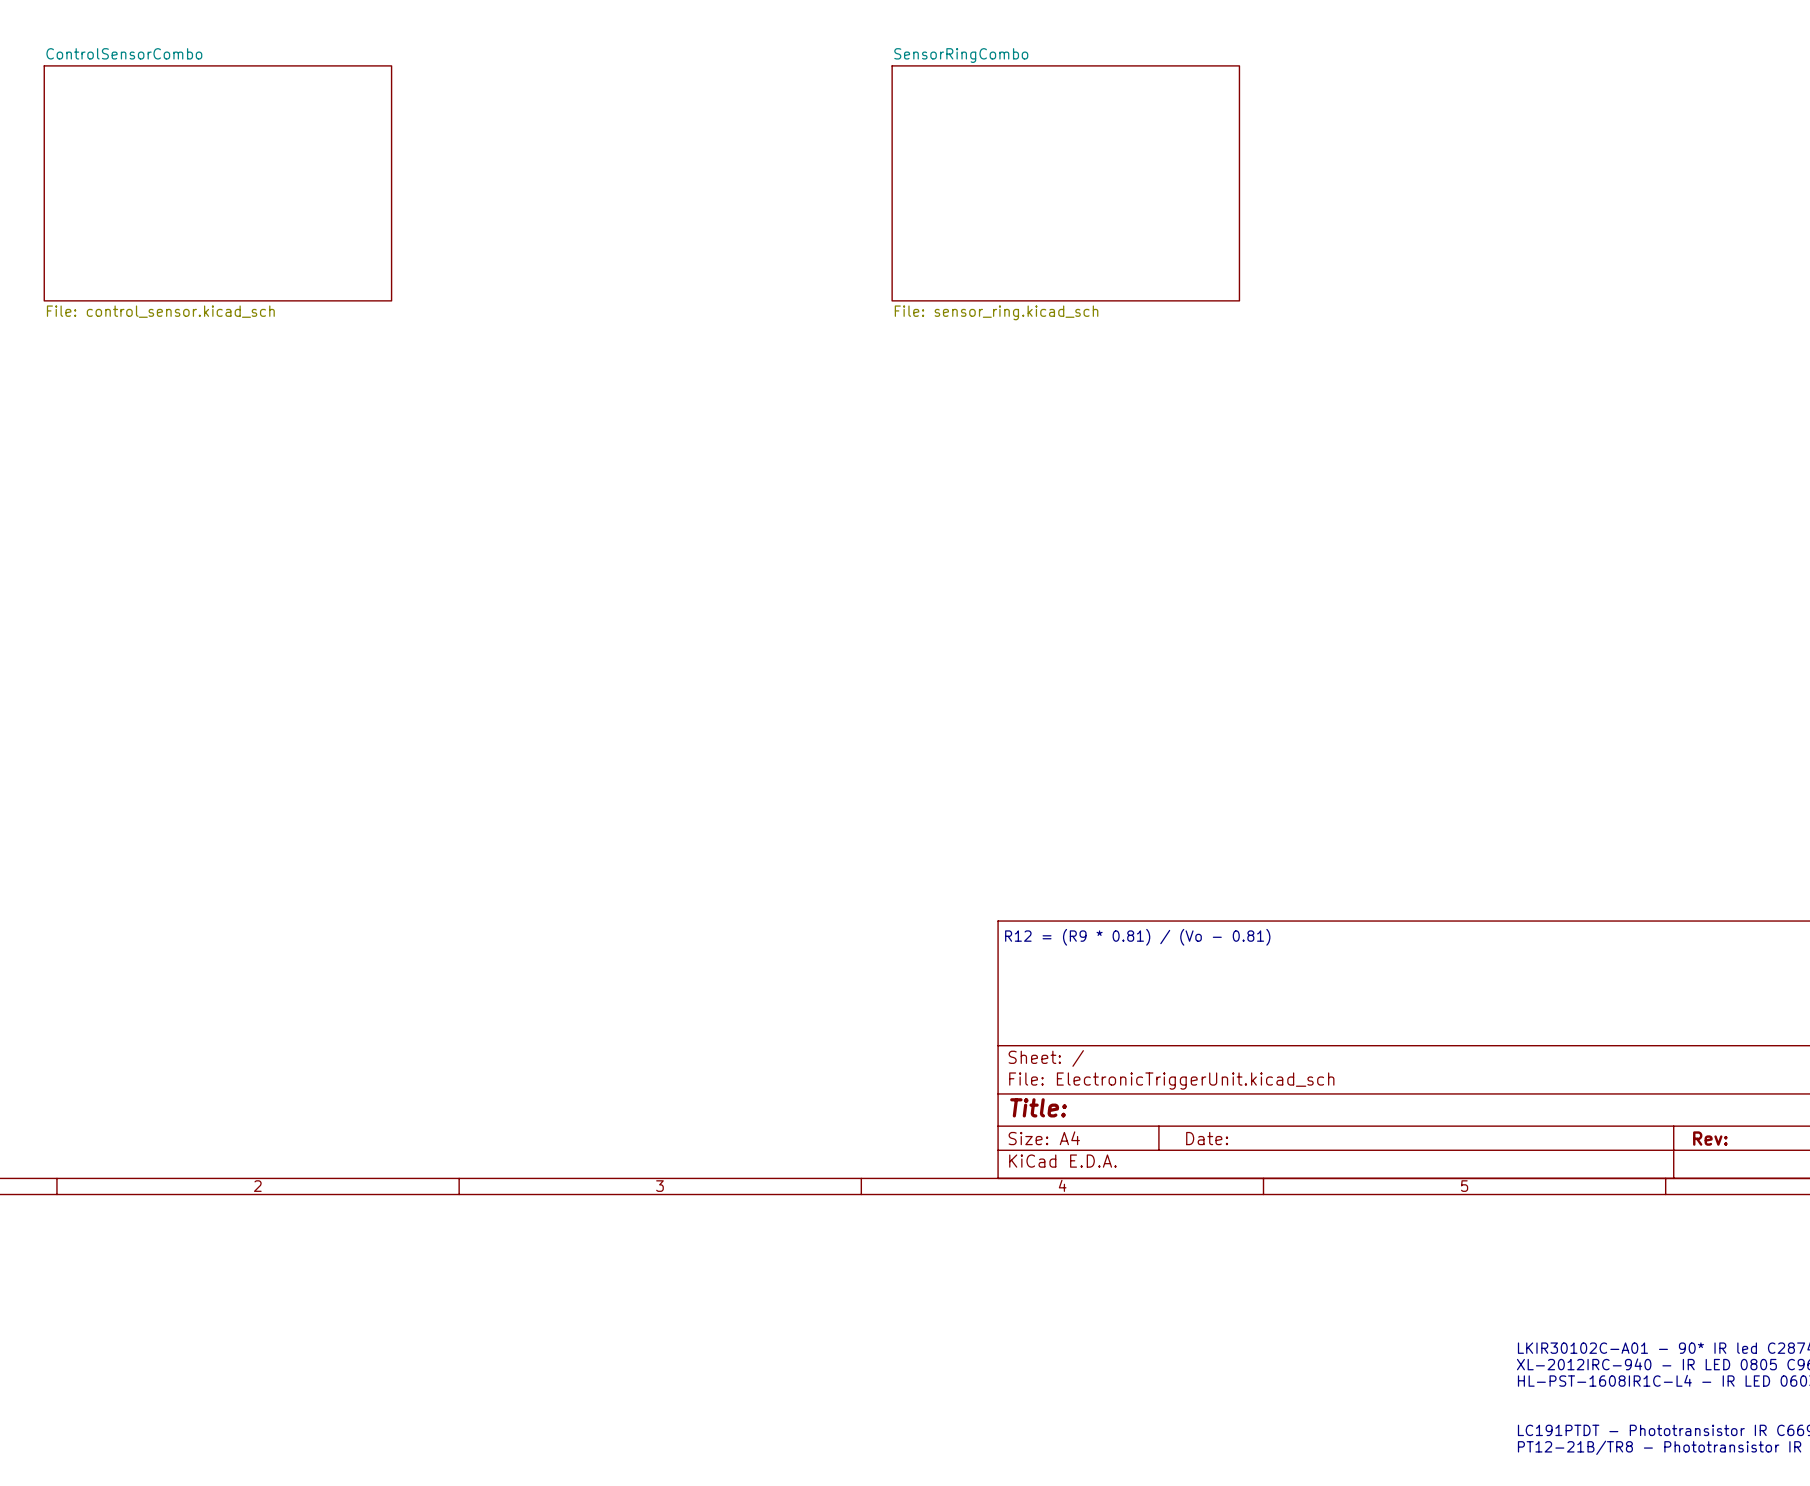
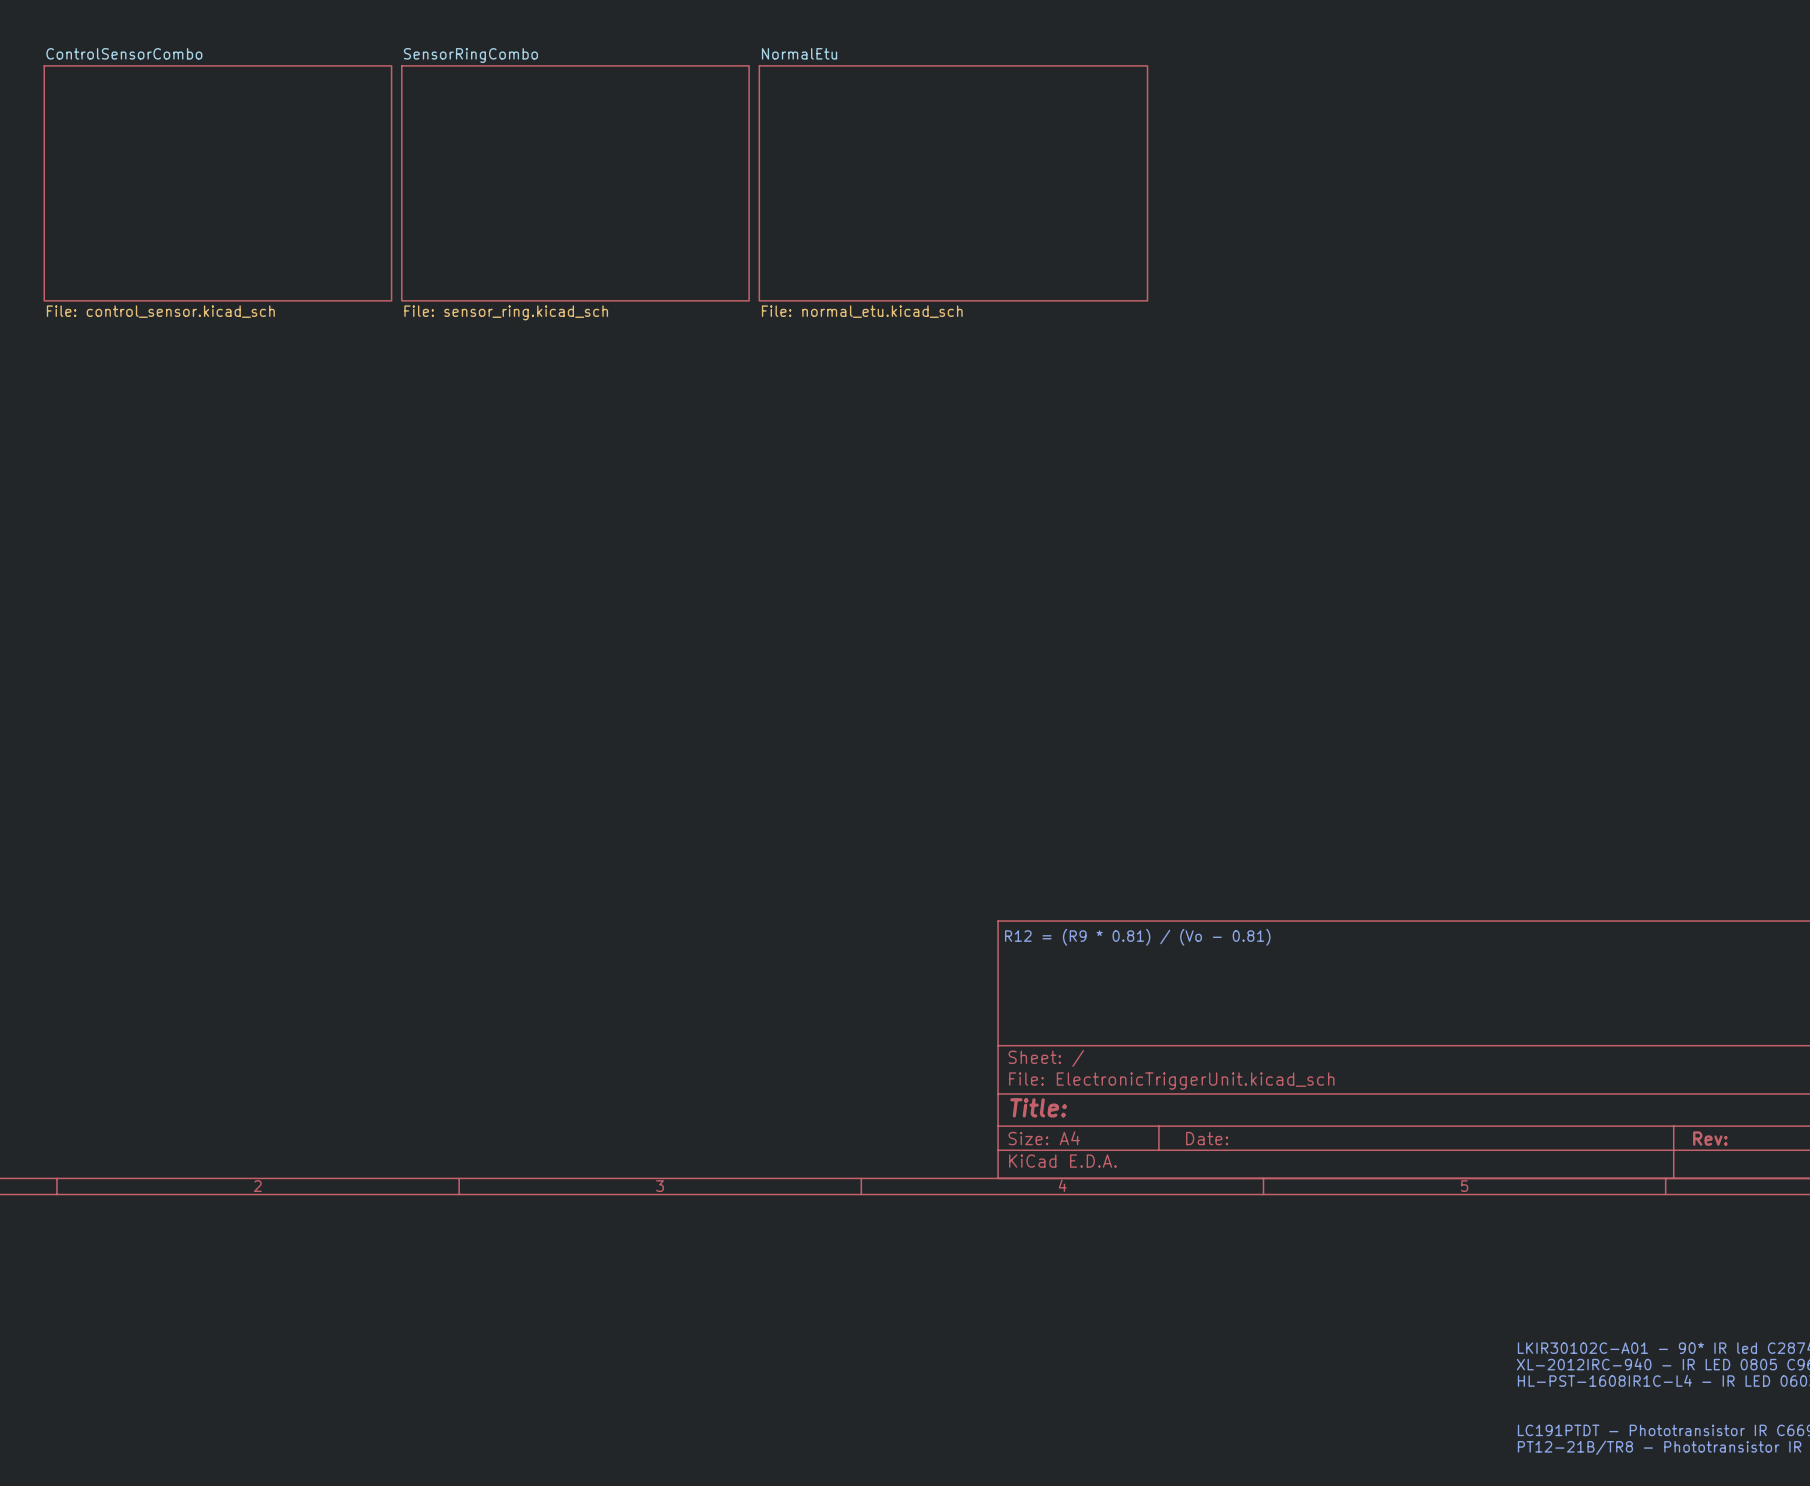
sheet SensorRingCombo: none -> File: sensor_ring.kicad_sch (575, 183)
sheet NormalEtu: none -> File: normal_etu.kicad_sch (953, 183)
sheet SensorRingCombo: File: sensor_ring.kicad_sch (1065, 183) -> none

